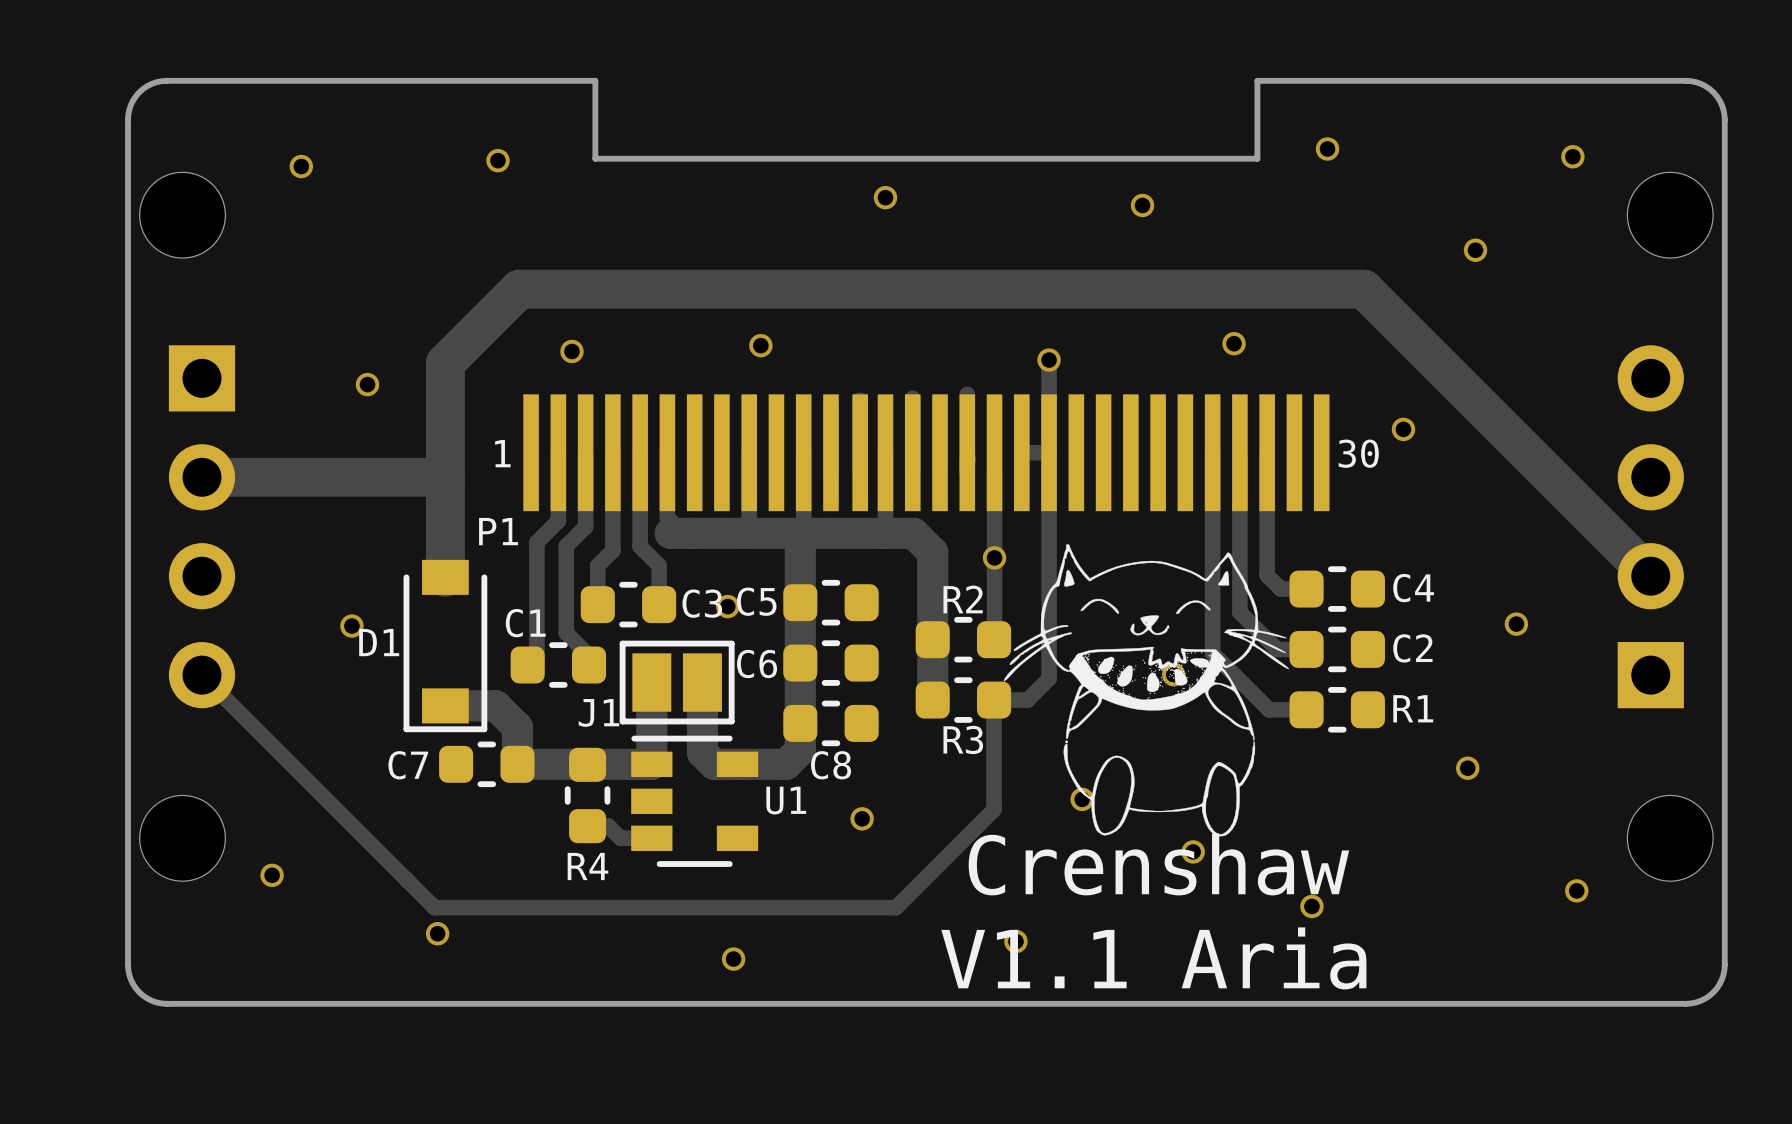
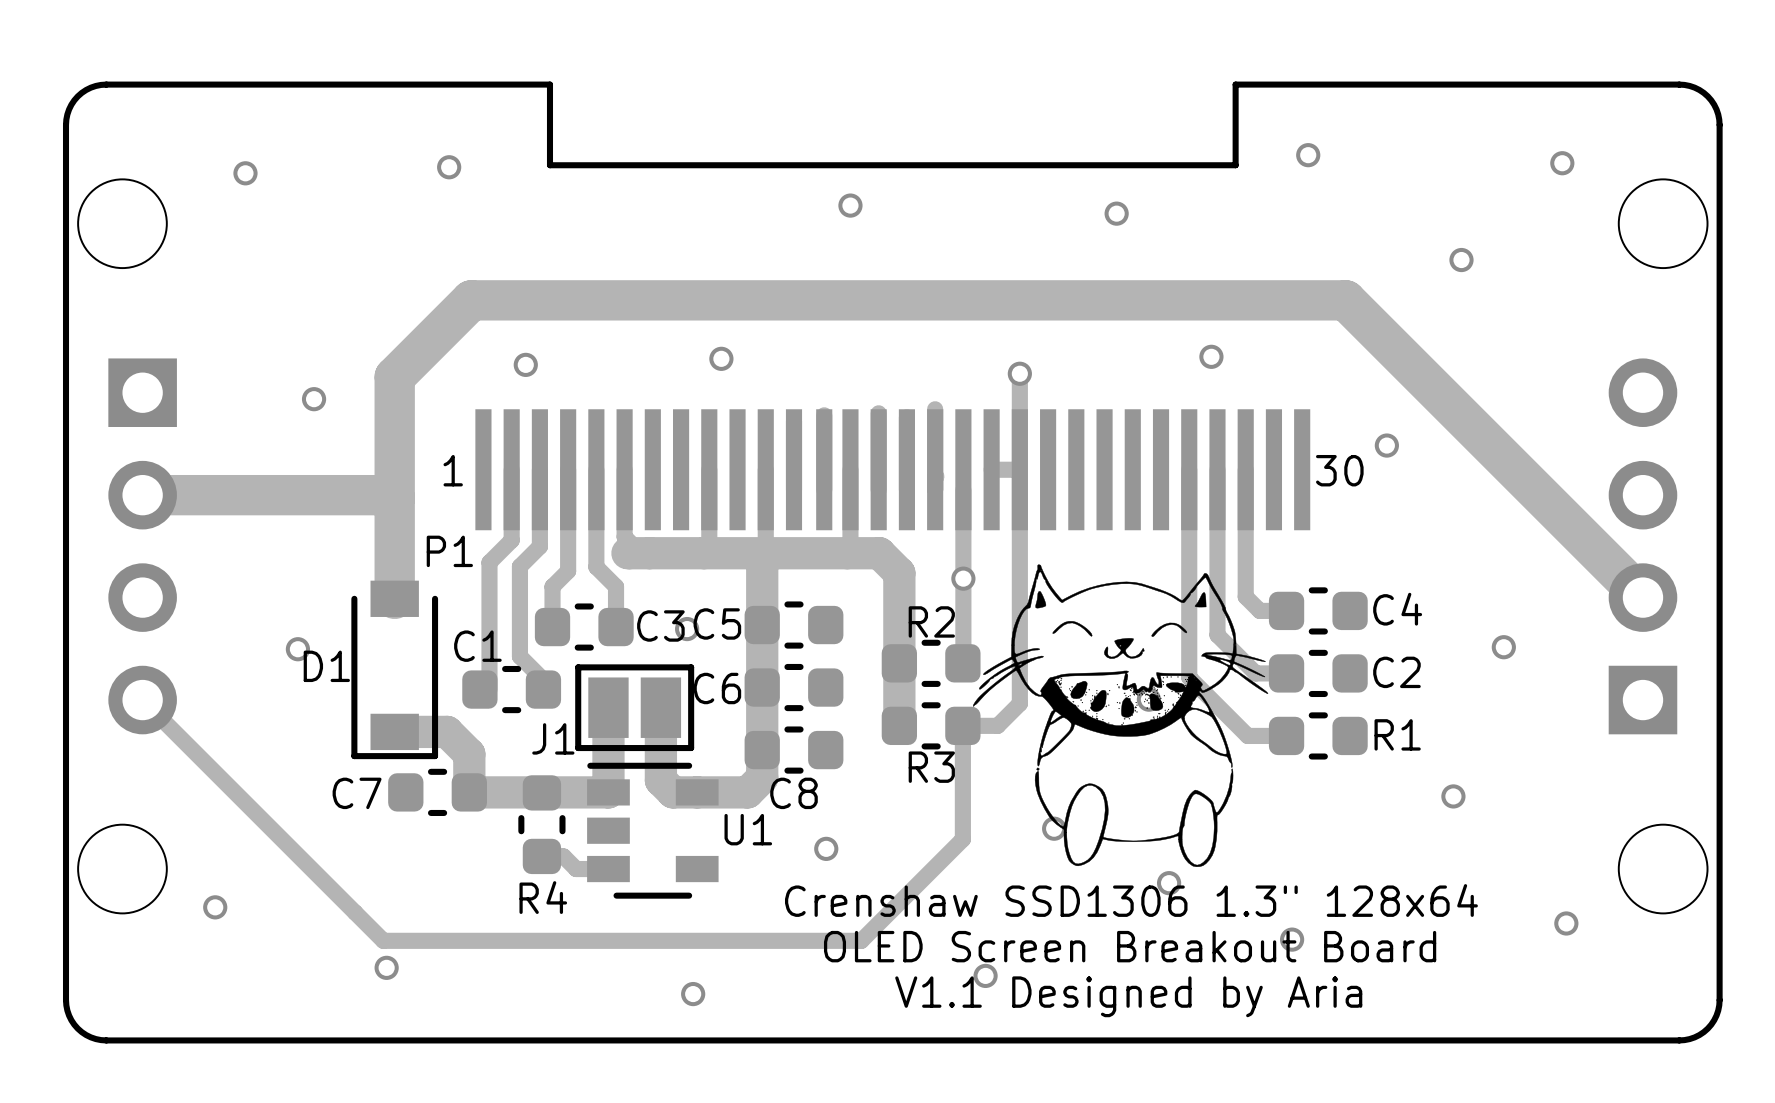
text: Crenshaw (1158, 864) -> Crenshaw SSD1306 1.3" 128x64 (1131, 900)
text: none -> OLED Screen Breakout Board (1130, 946)
text: V1.1 Aria (1153, 958) -> V1.1 Designed by Aria (1128, 996)

